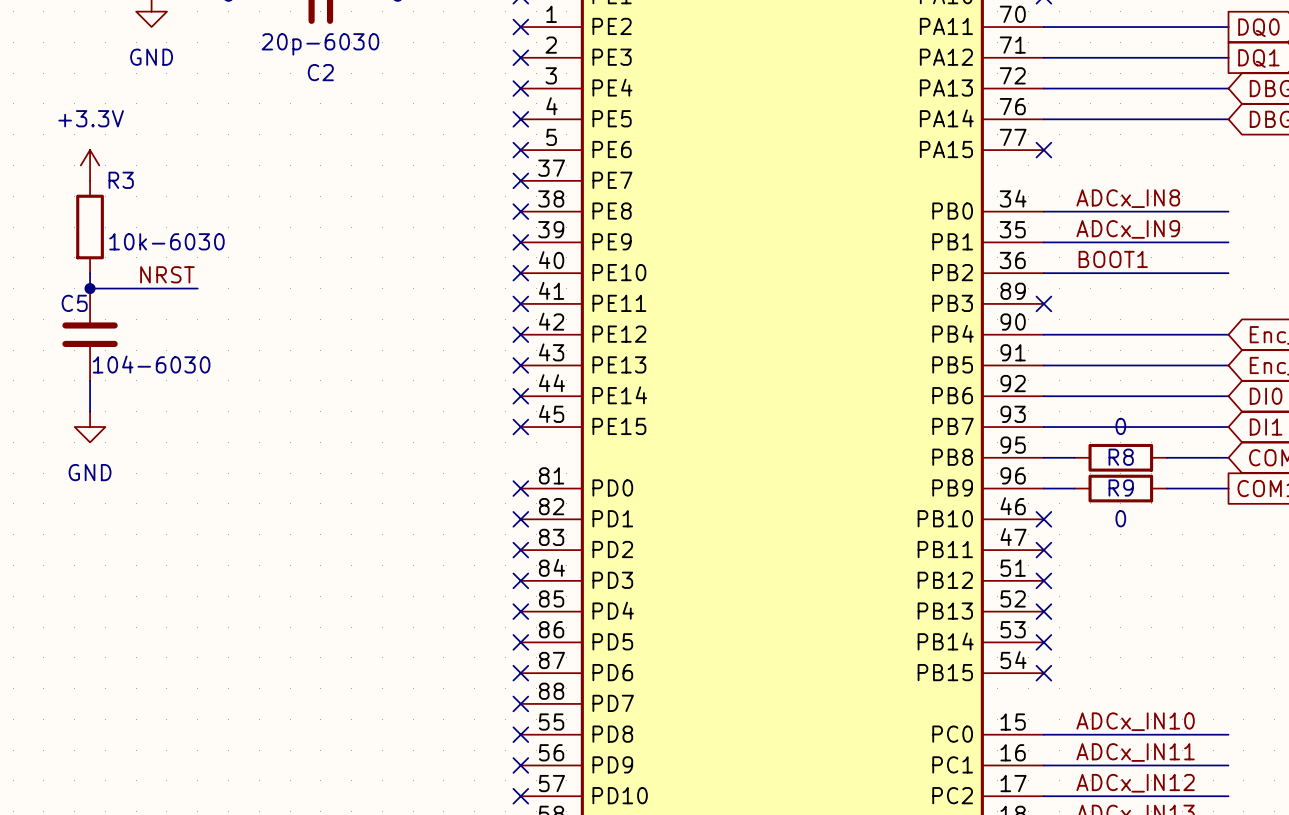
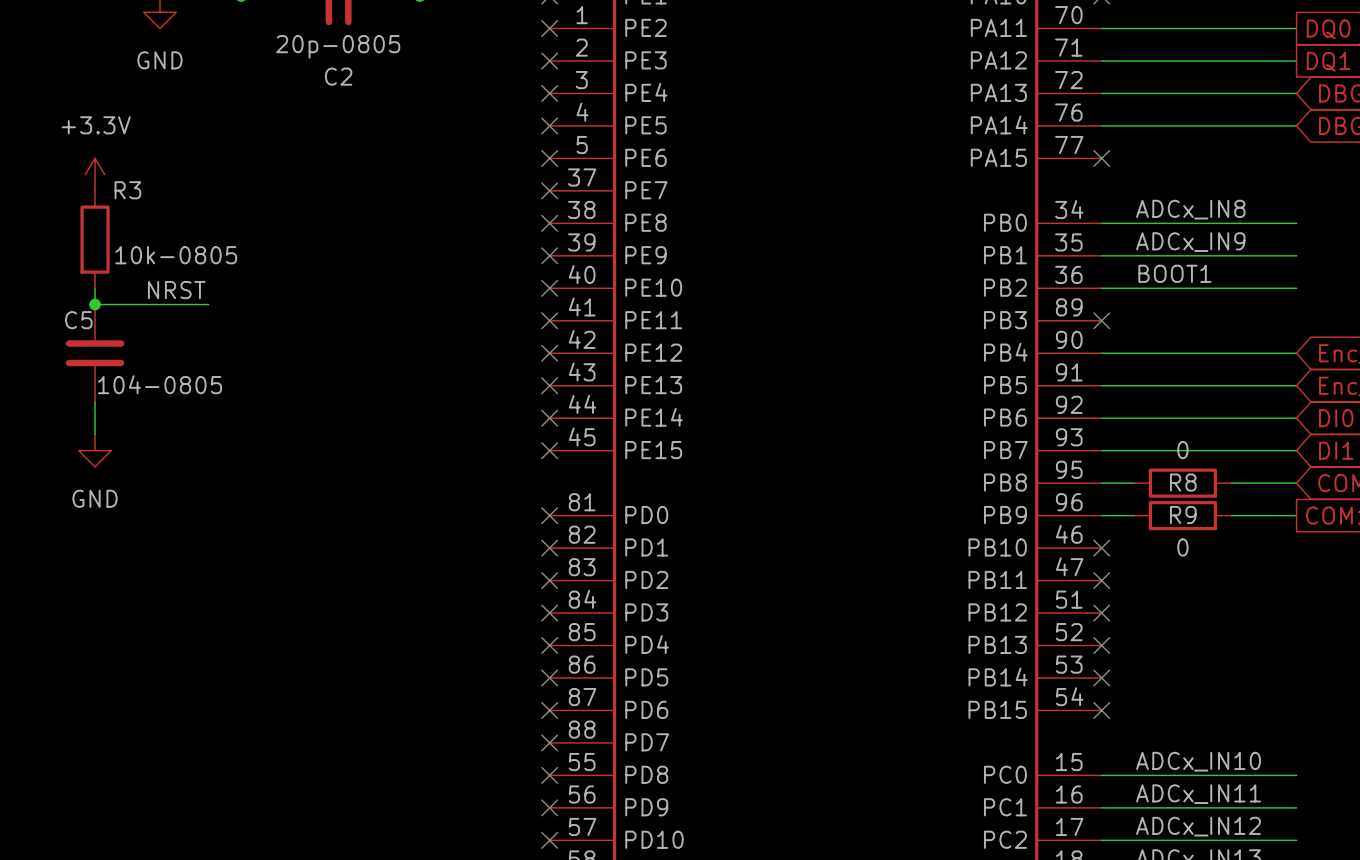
C2 value: 20p-6030 (320, 44) -> 20p-0805 (338, 46)
R3 value: 10k-6030 (166, 241) -> 10k-0805 (176, 255)
C5 value: 104-6030 (151, 364) -> 104-0805 (159, 384)

